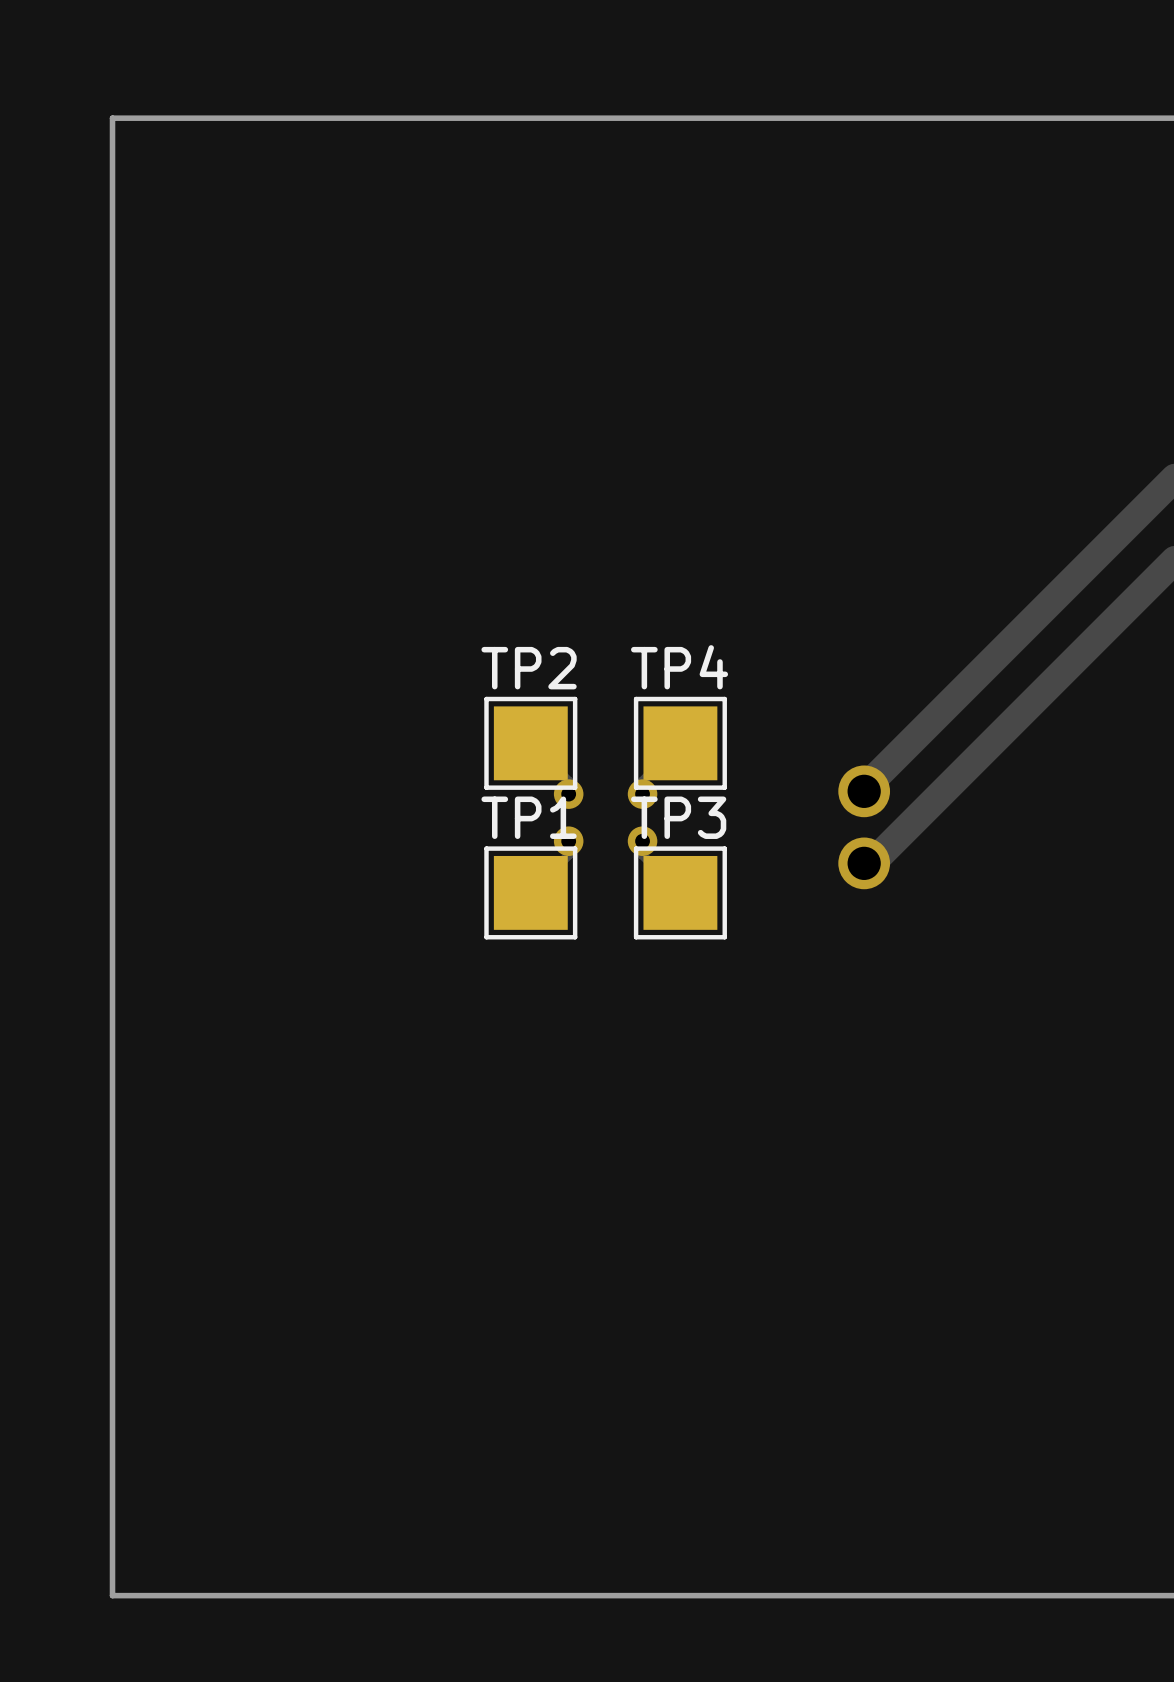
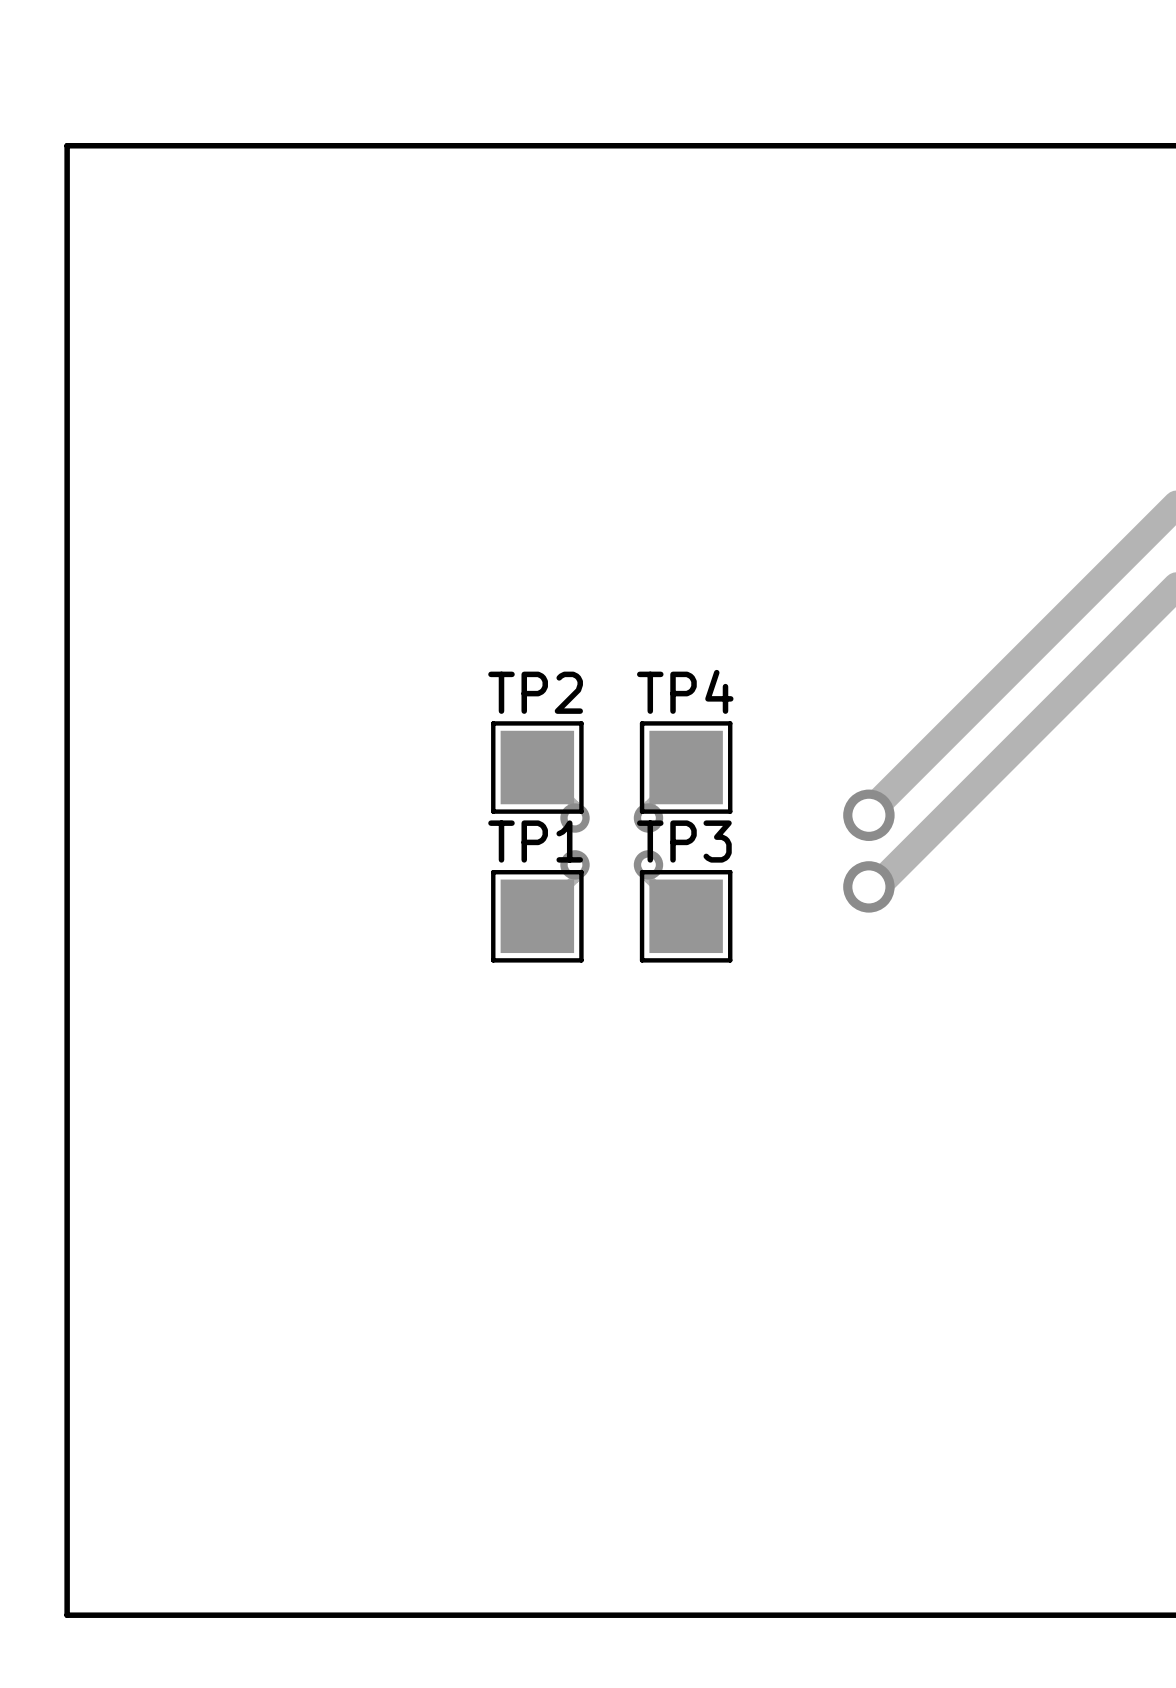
board edge: (112, 118) (112, 1595) -> (121, 145) (67, 145) (67, 1615) (121, 1615)

